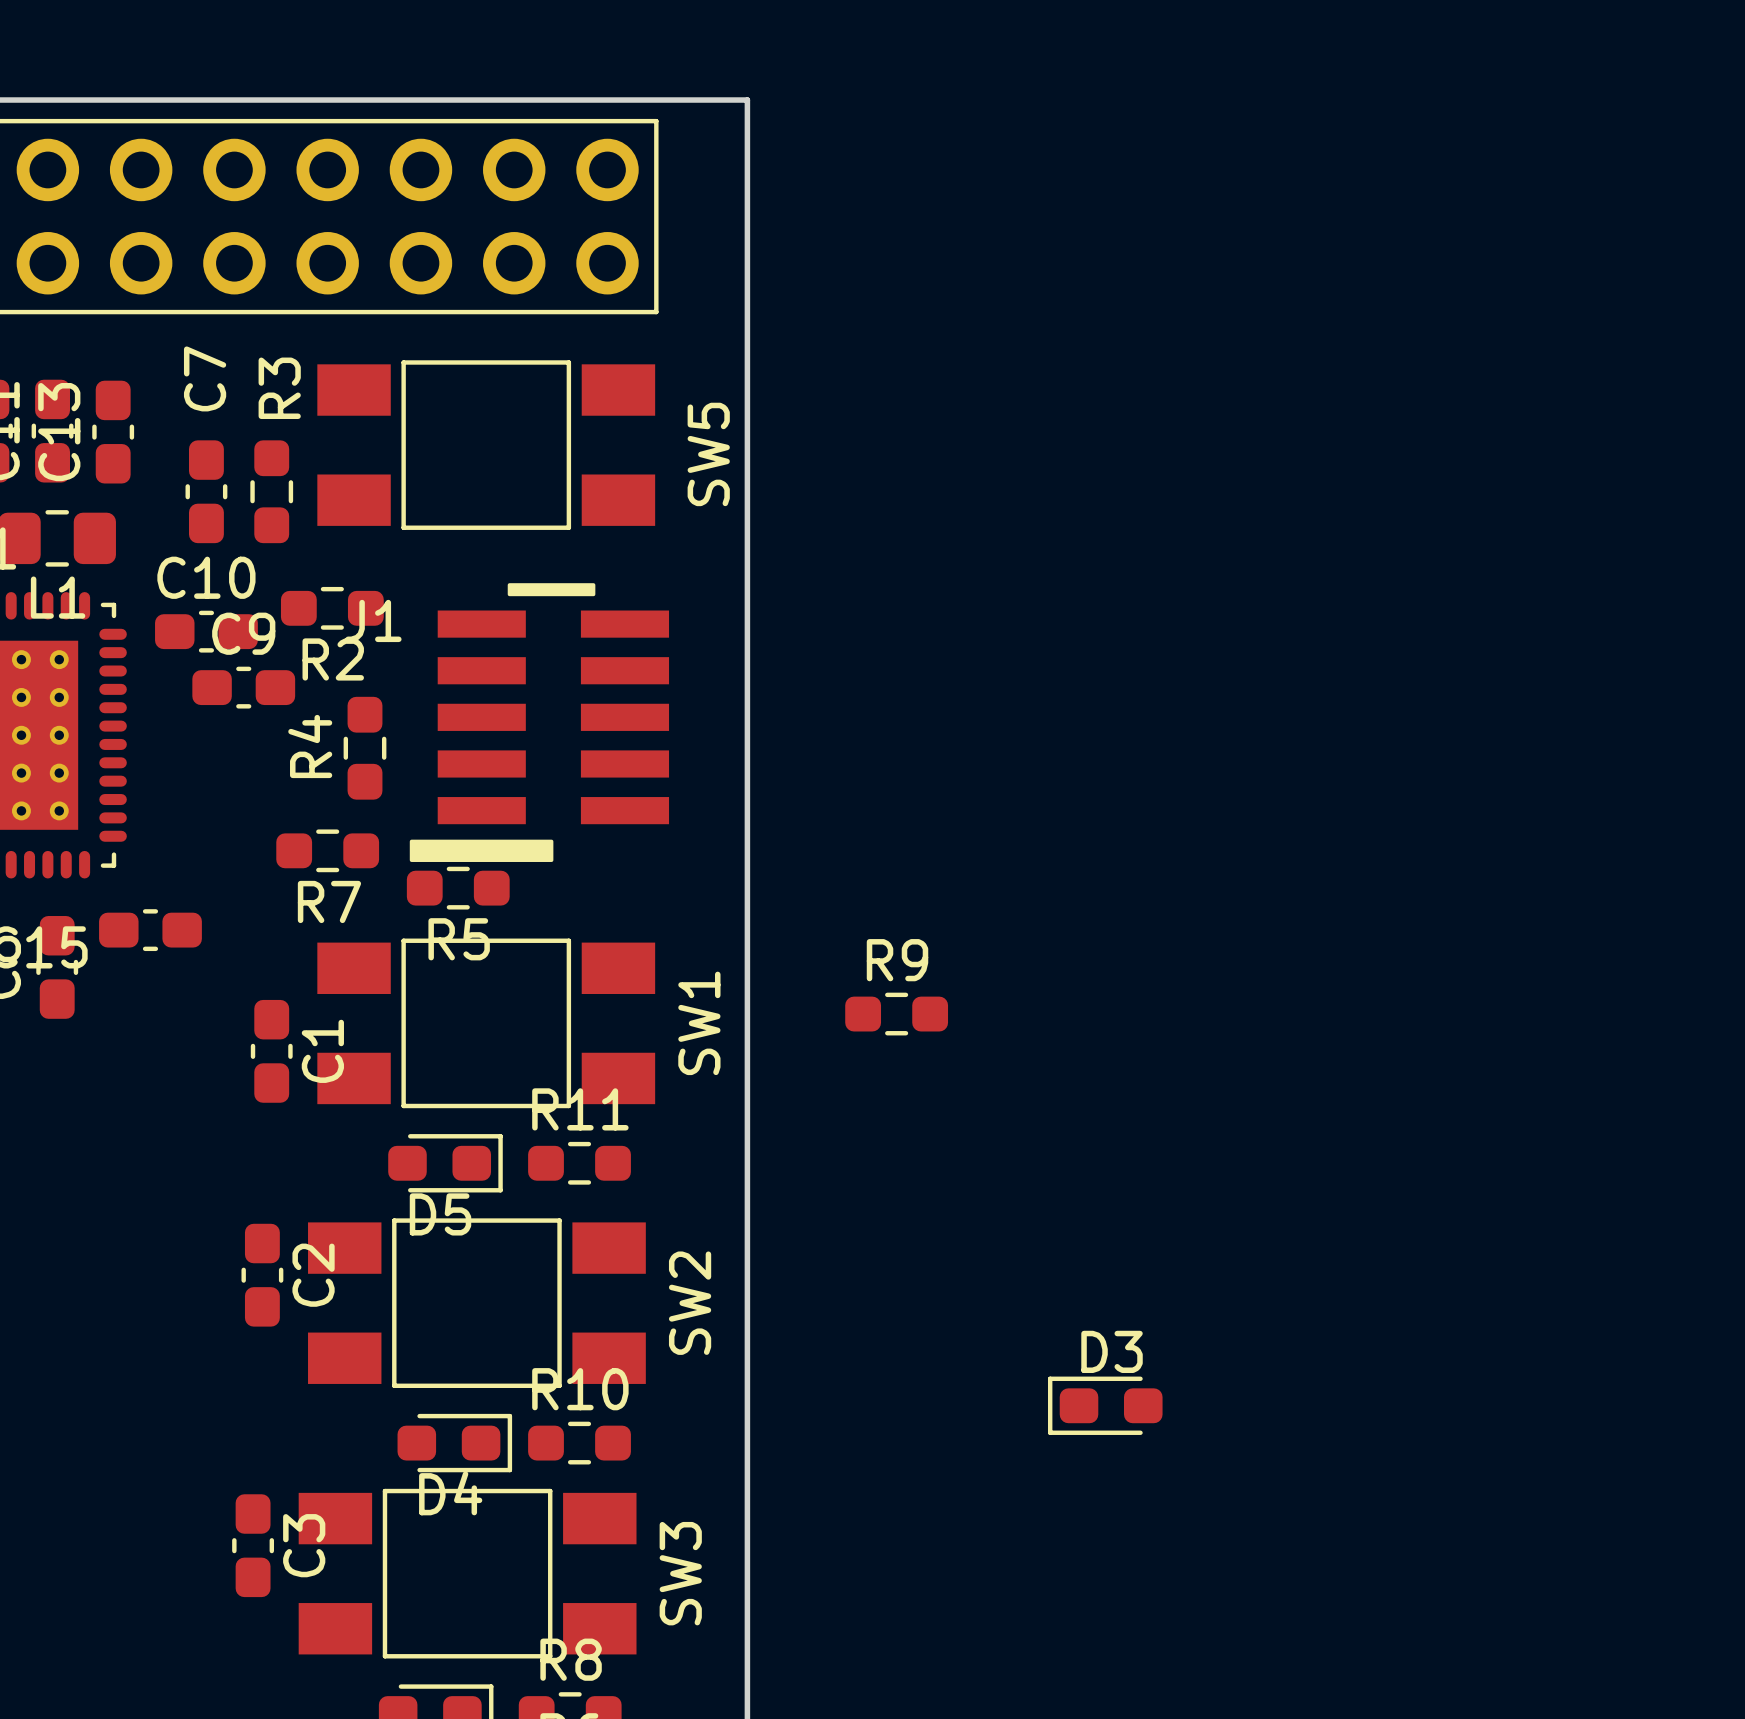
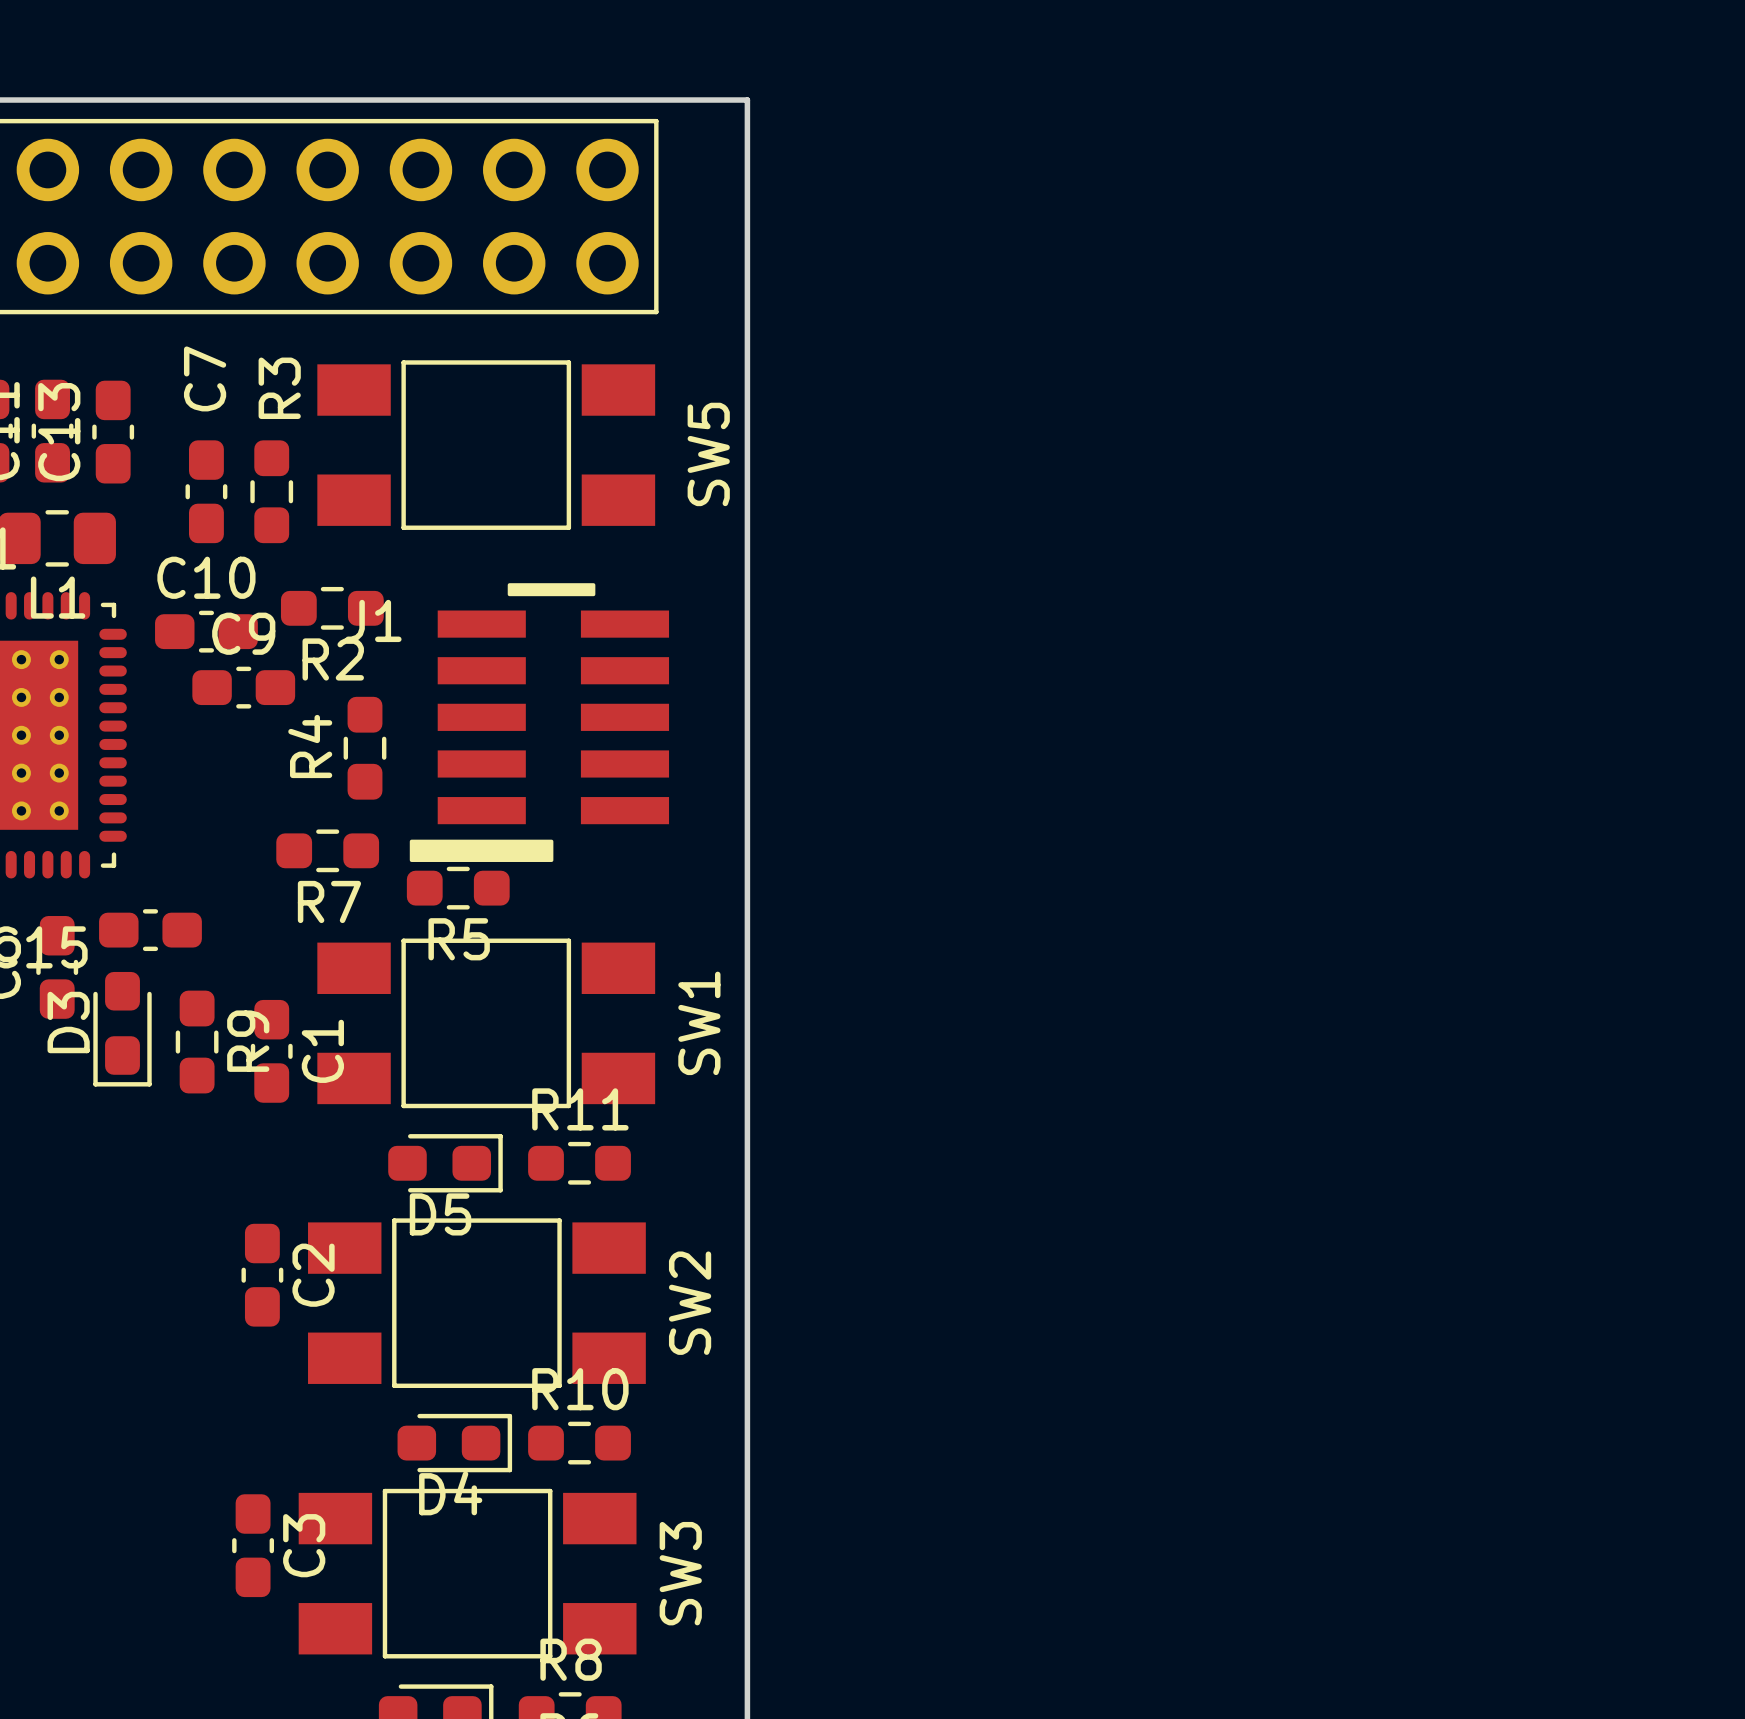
R9 rotation: 0° (896, 1014) -> 90° clockwise (197, 1042)
R9 position: (896, 1014) -> (197, 1042)
D3 rotation: 0° (1105, 1405) -> 90° counterclockwise (122, 1029)
D3 position: (1105, 1405) -> (122, 1029)

